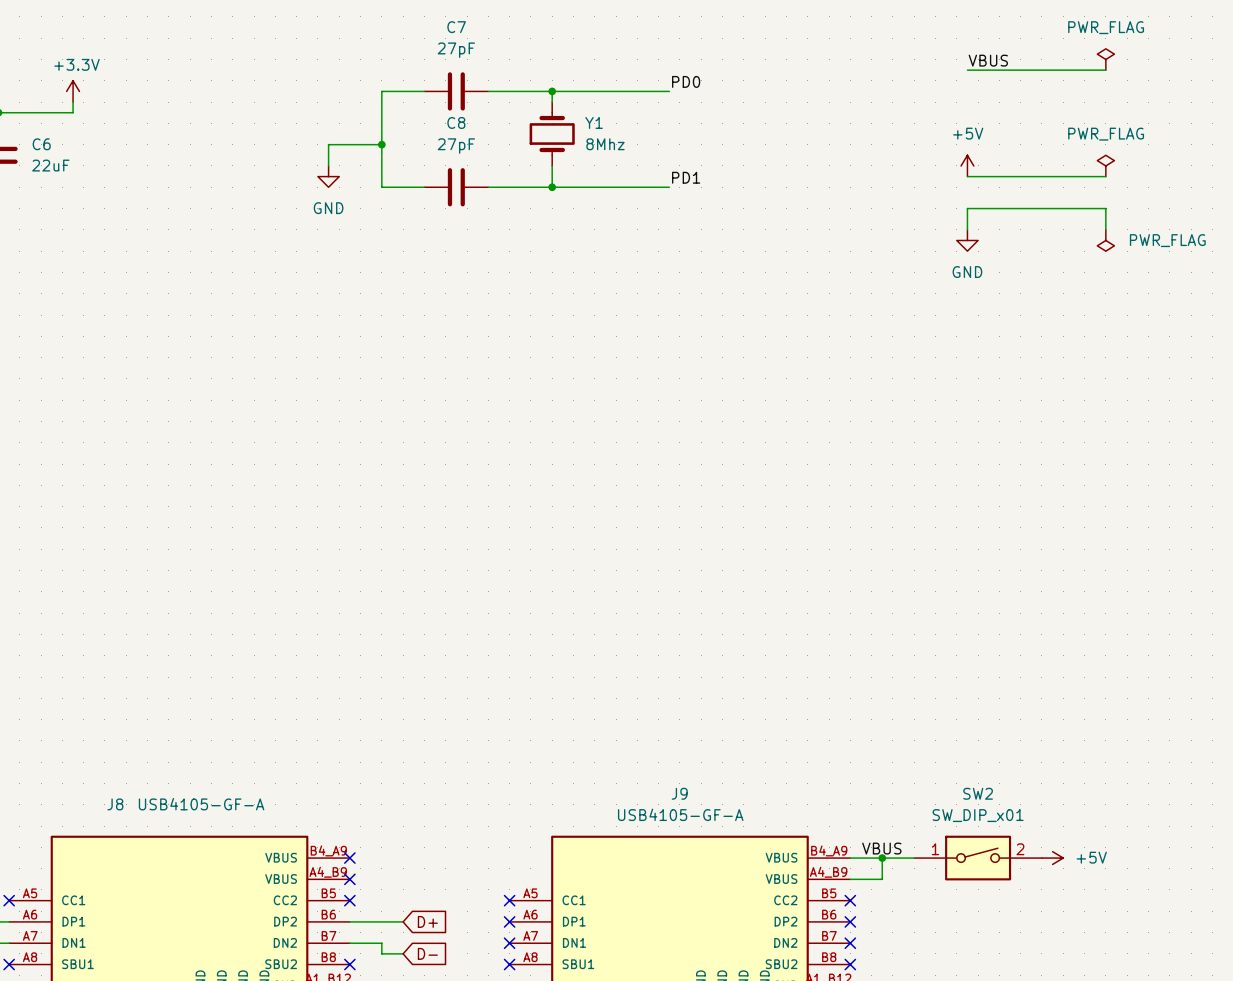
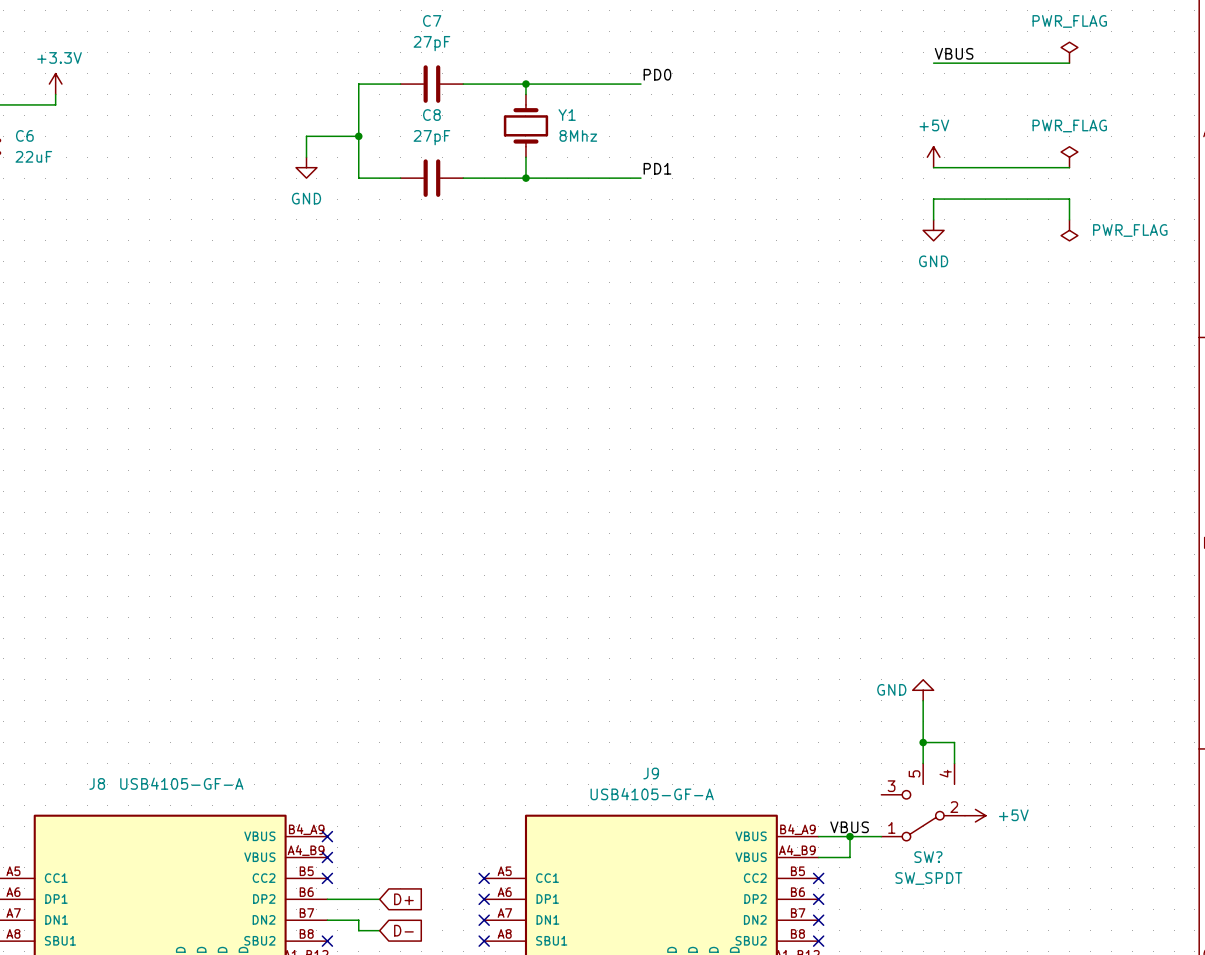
power symbol: none -> GND (923, 690)
wire: none -> (923, 700) (923, 763)
wire: none -> (923, 742) (954, 742) (954, 763)
junction: none -> (923, 742)
SW?: none -> SW_SPDT (923, 802)
SW2: SW_DIP_x01 (978, 858) -> none
power symbol position: +5V (1052, 858) -> +5V (975, 815)

